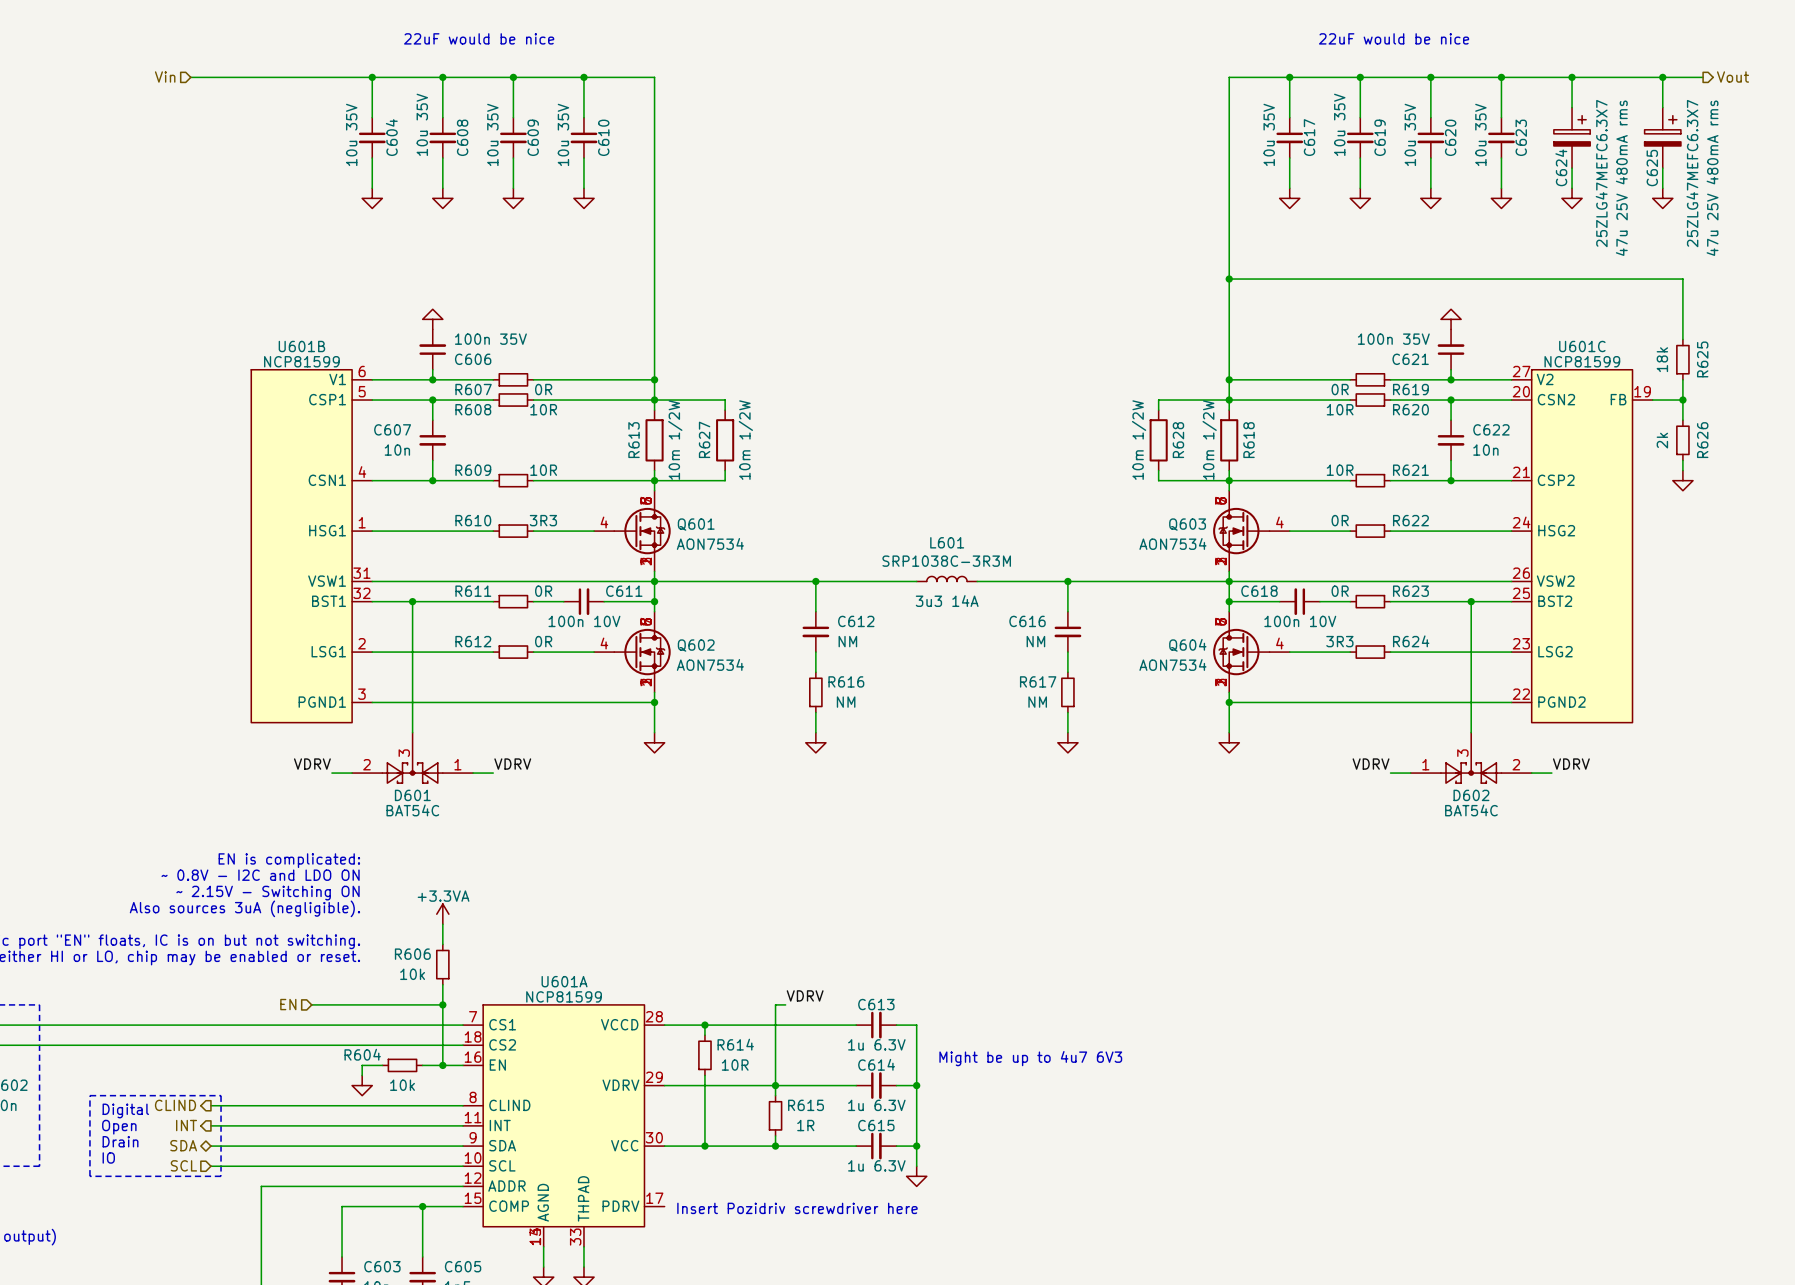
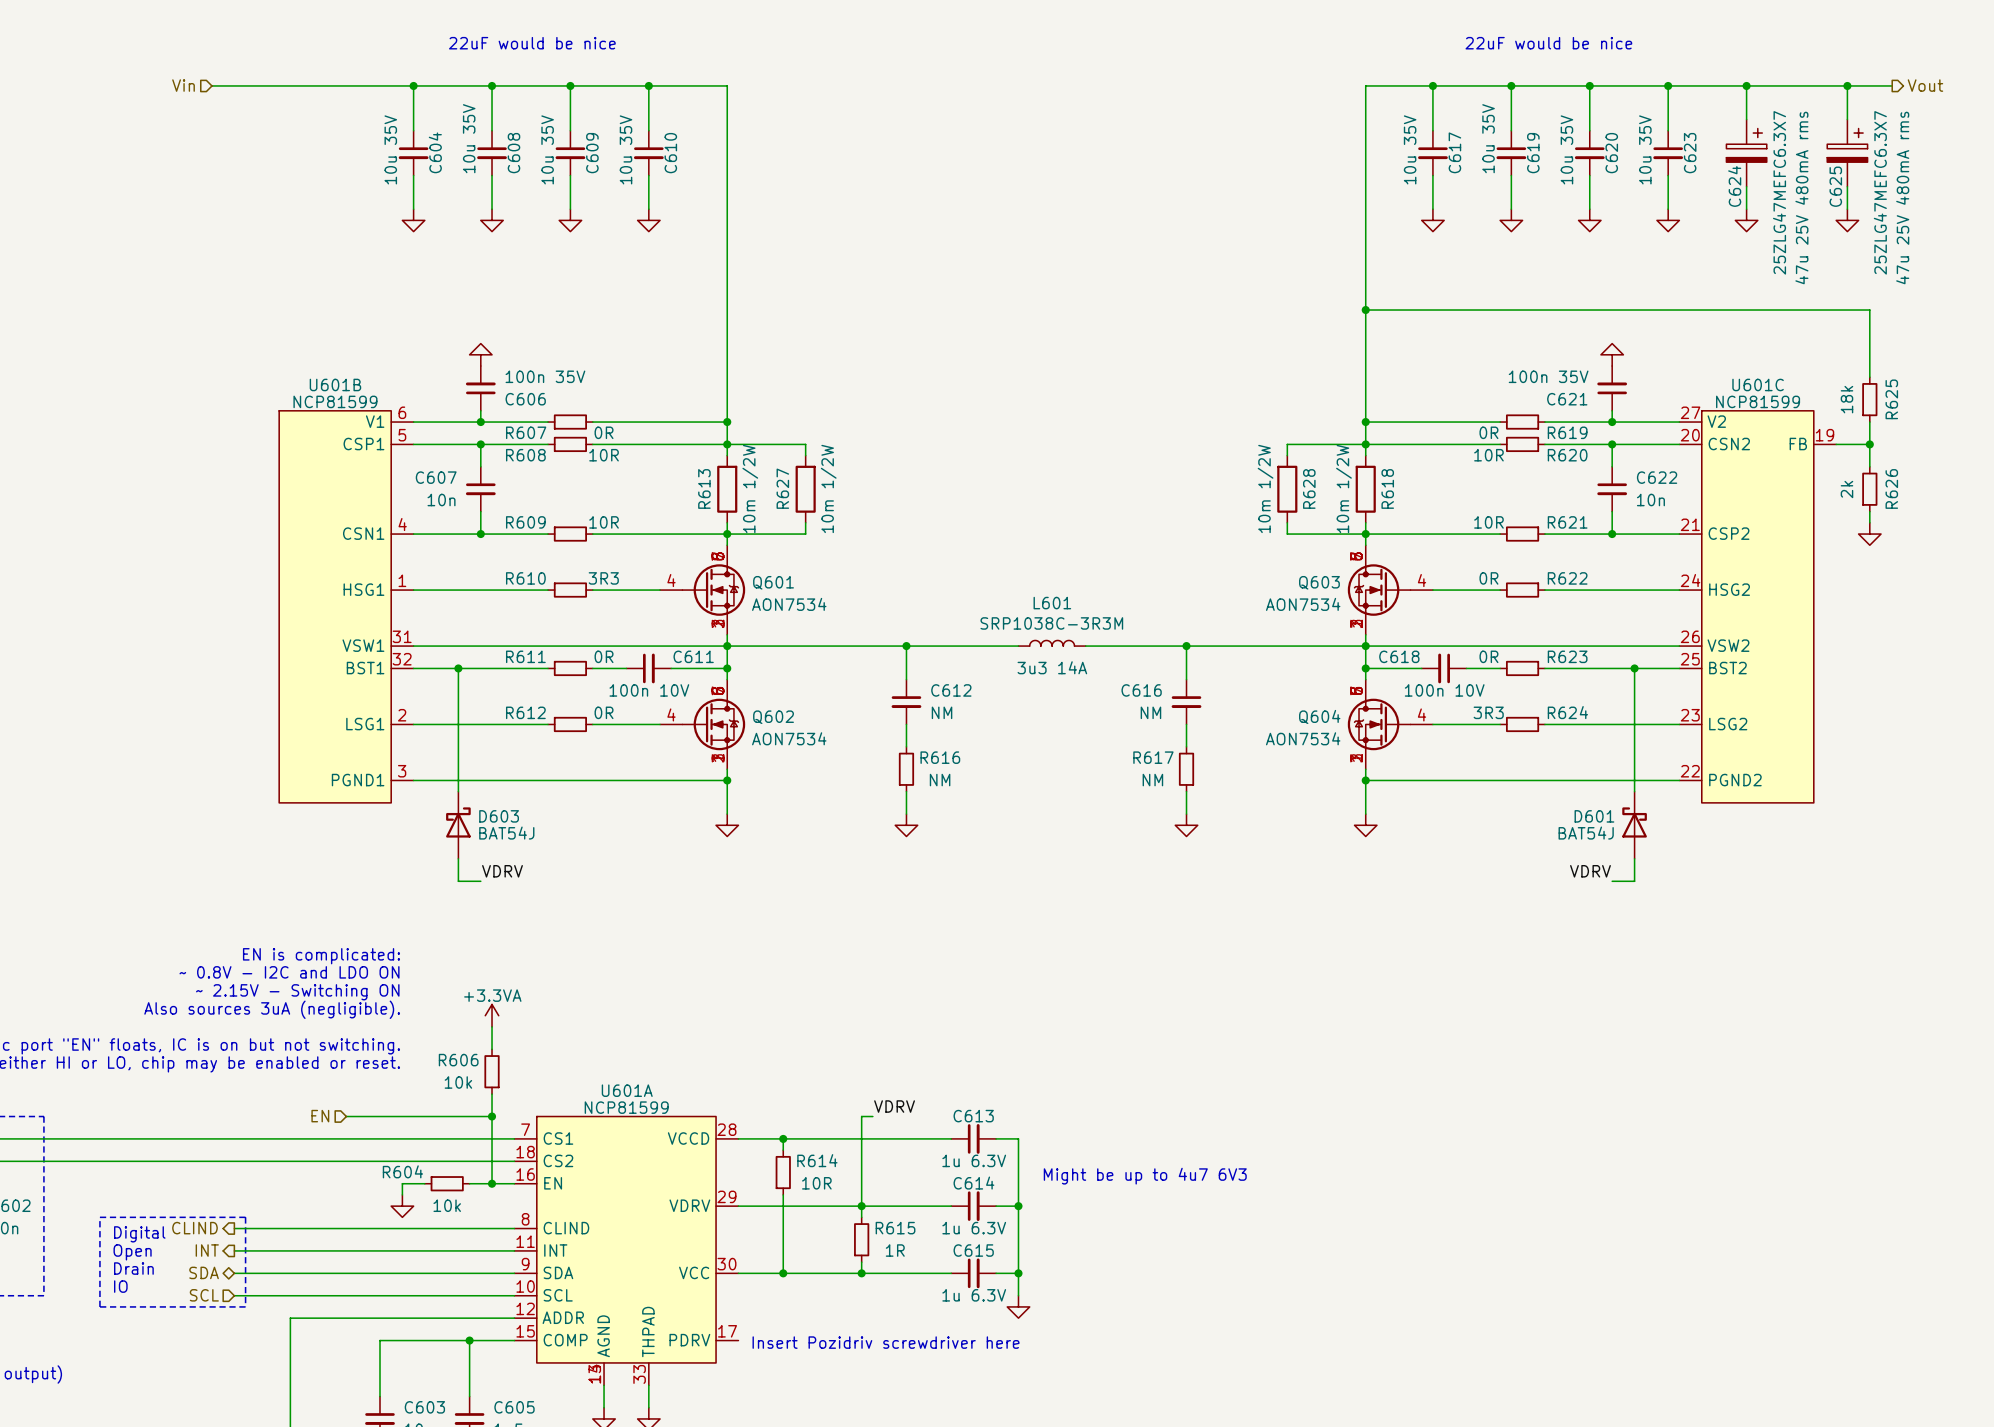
D601 symbol: [352, 732, 474, 784] -> [1622, 791, 1647, 859]
D603: none -> BAT54J (458, 825)
D602: BAT54C (1471, 757) -> none
label: VDRV (312, 764) -> none
label: VDRV (512, 764) -> none
label: VDRV (1371, 764) -> none
label: VDRV (1571, 764) -> none
wire: (331, 773) (352, 773) -> none
wire: none -> (458, 858) (458, 881) (480, 881)
wire: (473, 773) (493, 773) -> none
wire: (1390, 773) (1410, 773) -> none
wire: none -> (1634, 858) (1634, 881) (1612, 881)
wire: (1531, 773) (1551, 773) -> none
label: none -> VDRV (502, 871)
label: none -> VDRV (1590, 871)
D601 name position: D601 (412, 795) -> D601 (1594, 816)
D601 value: BAT54C (412, 810) -> BAT54J (1586, 833)

